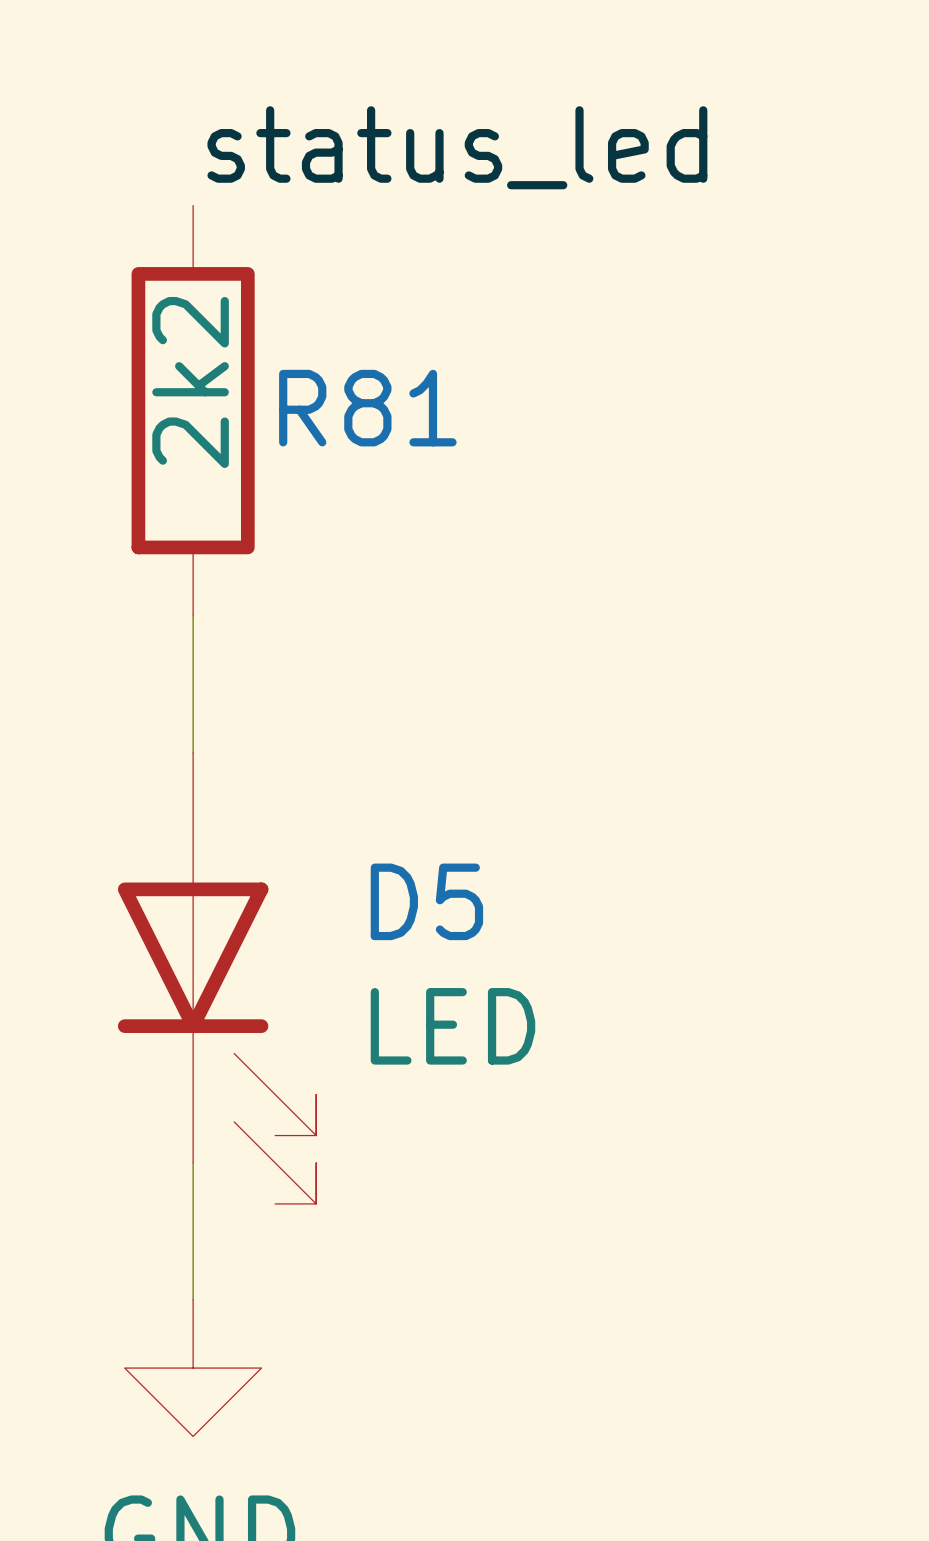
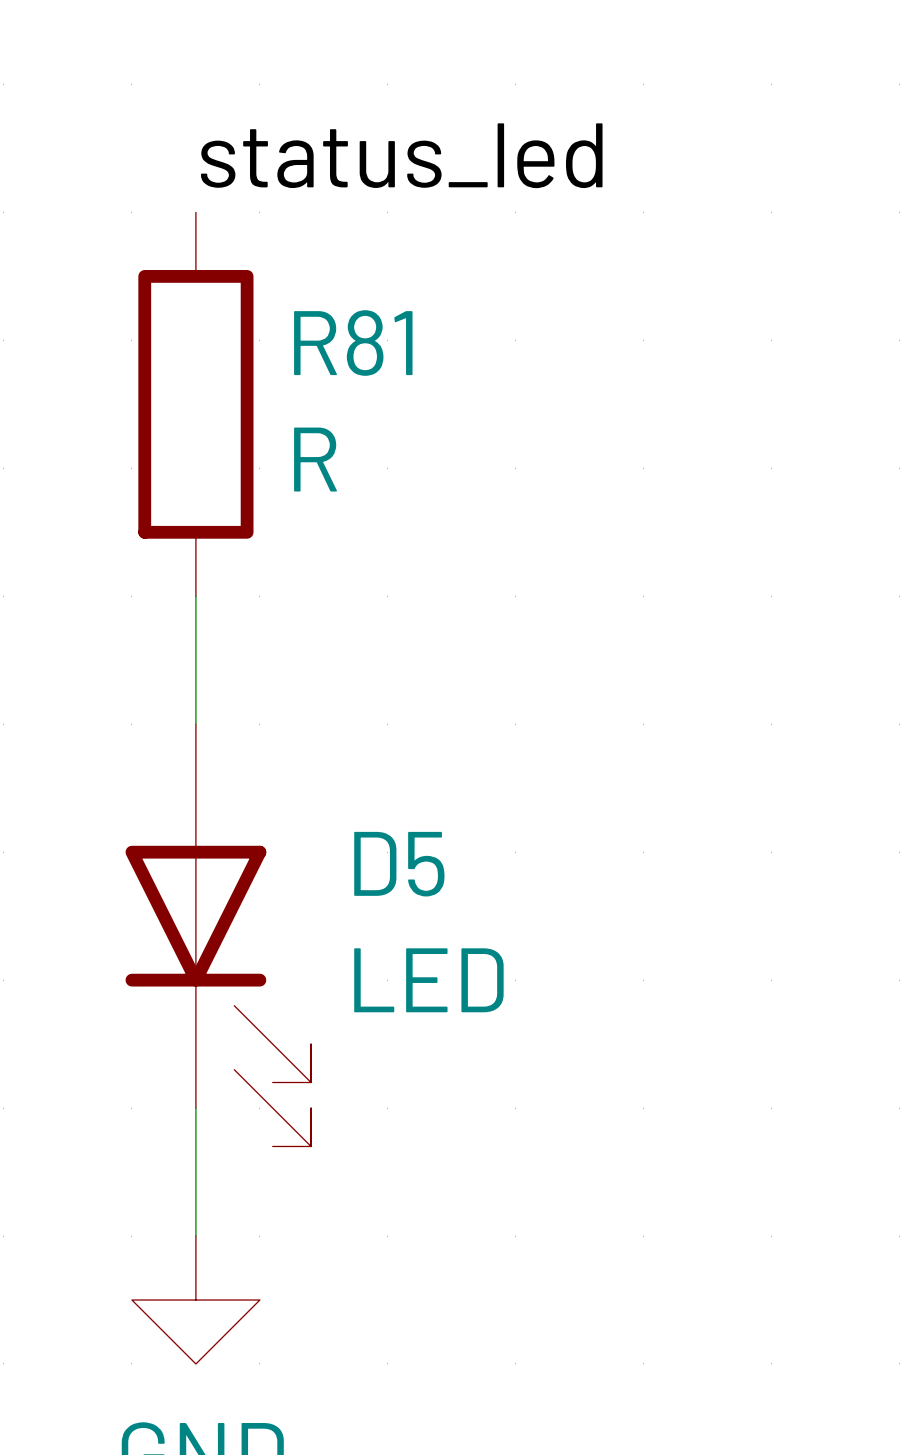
R81 value: 2k2 (190, 382) -> R (315, 459)
R81 name position: R81 (367, 408) -> R81 (353, 343)

